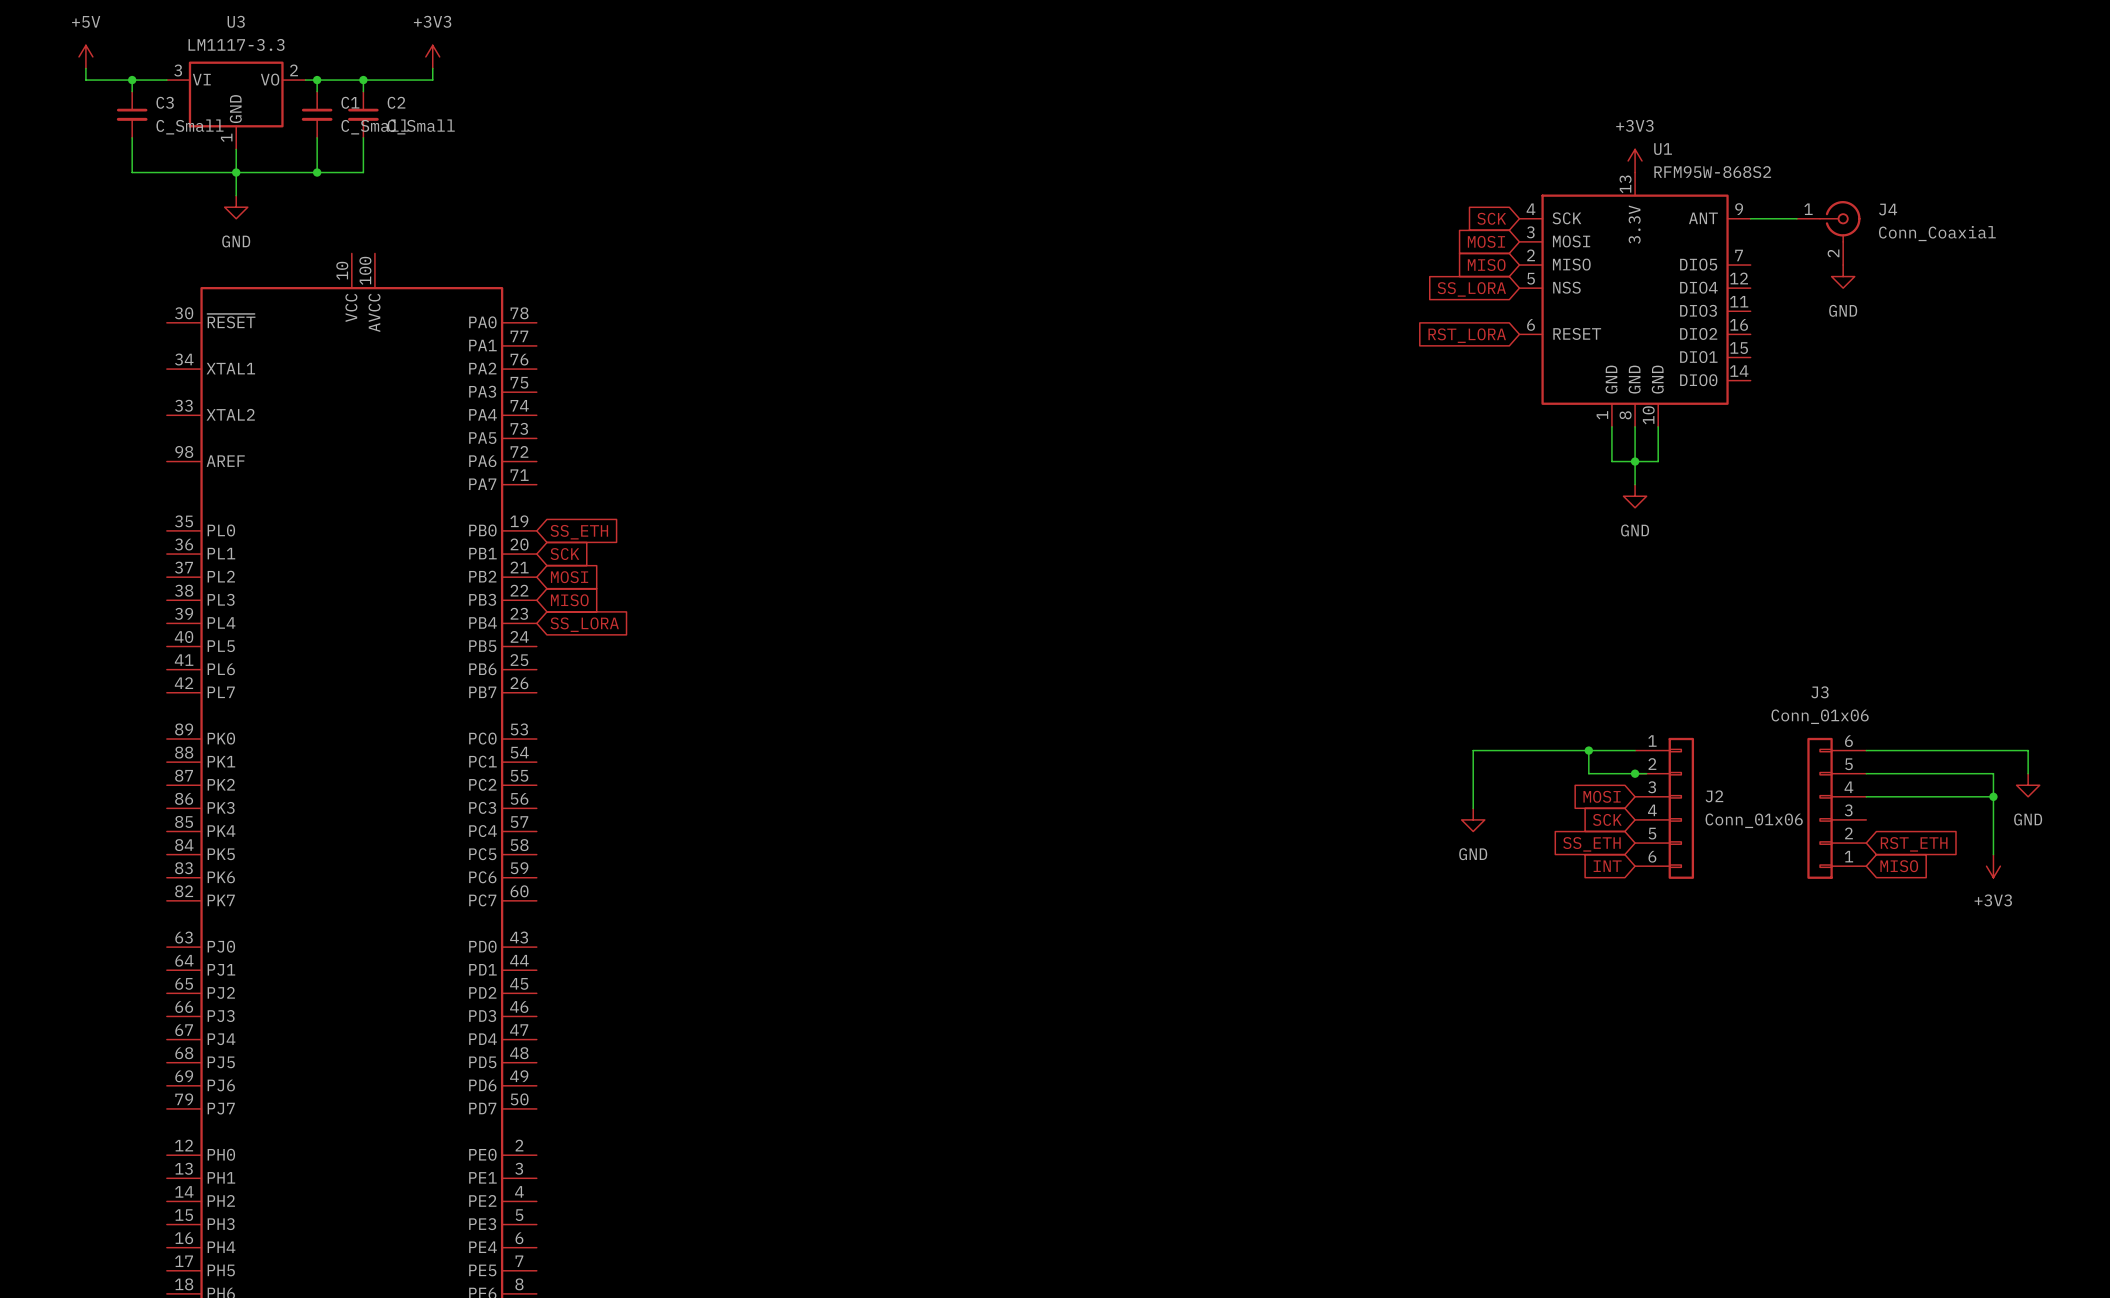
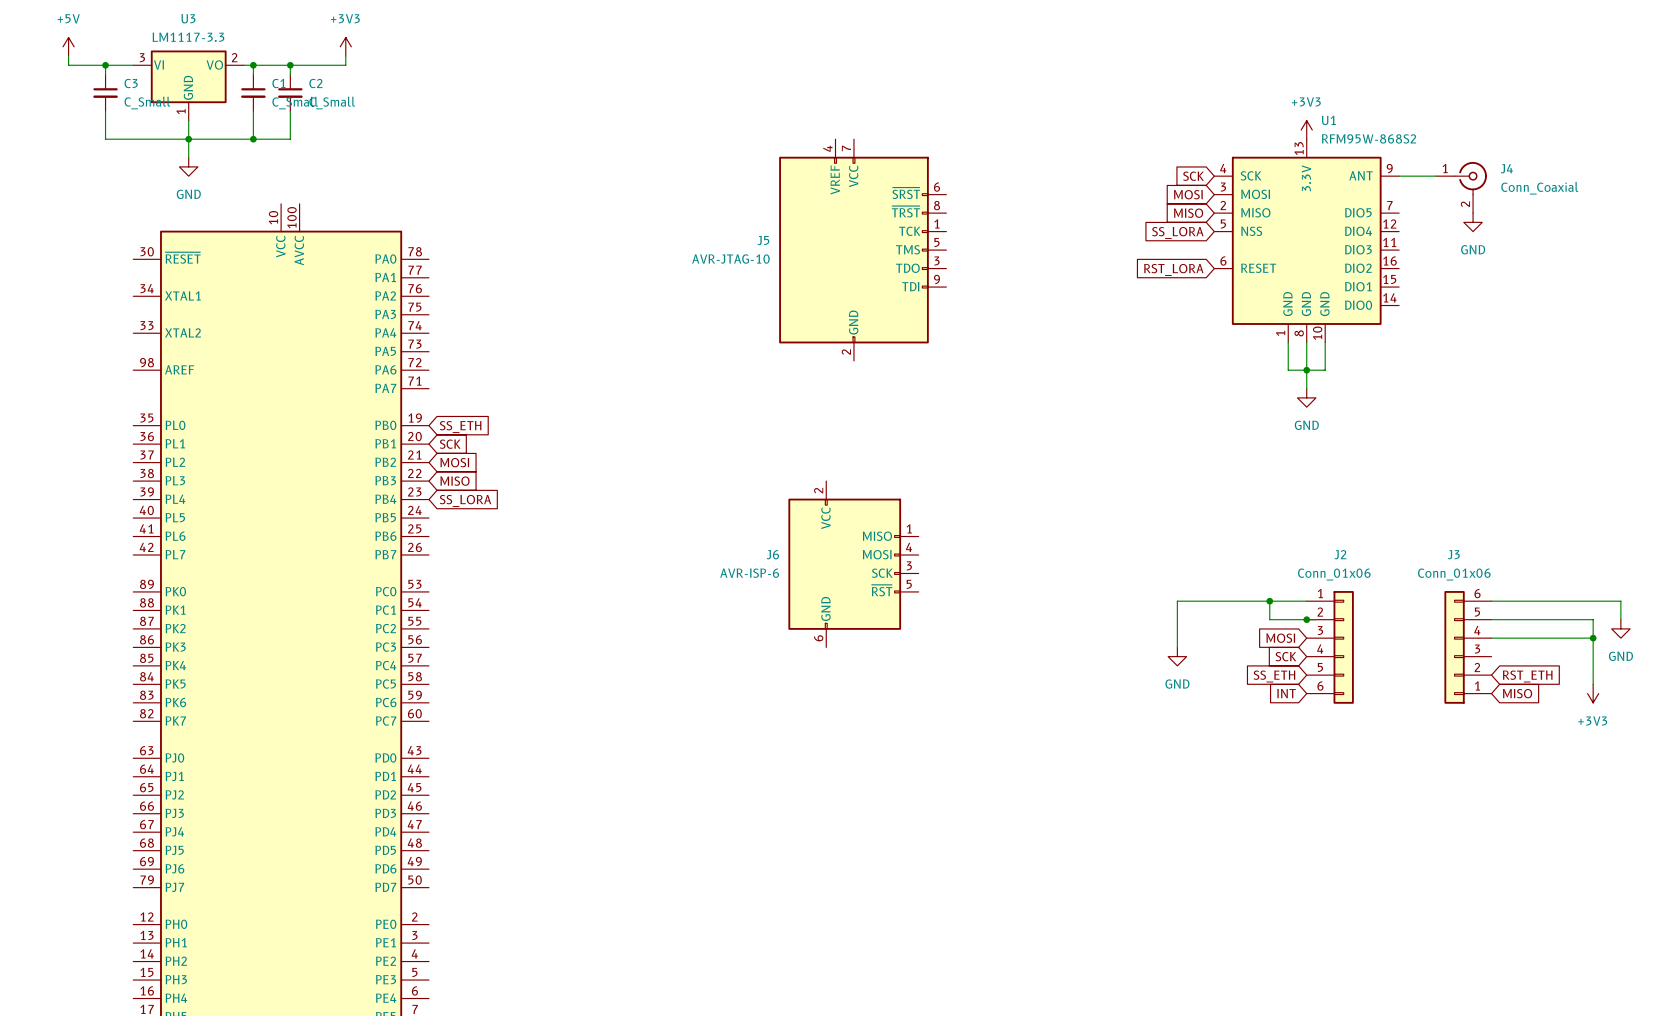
J5: none -> AVR-JTAG-10 (862, 250)
J6: none -> AVR-ISP-6 (853, 564)
J2 name position: J2 (1714, 796) -> J2 (1340, 554)
J2 value position: Conn_01x06 (1754, 820) -> Conn_01x06 (1334, 574)

